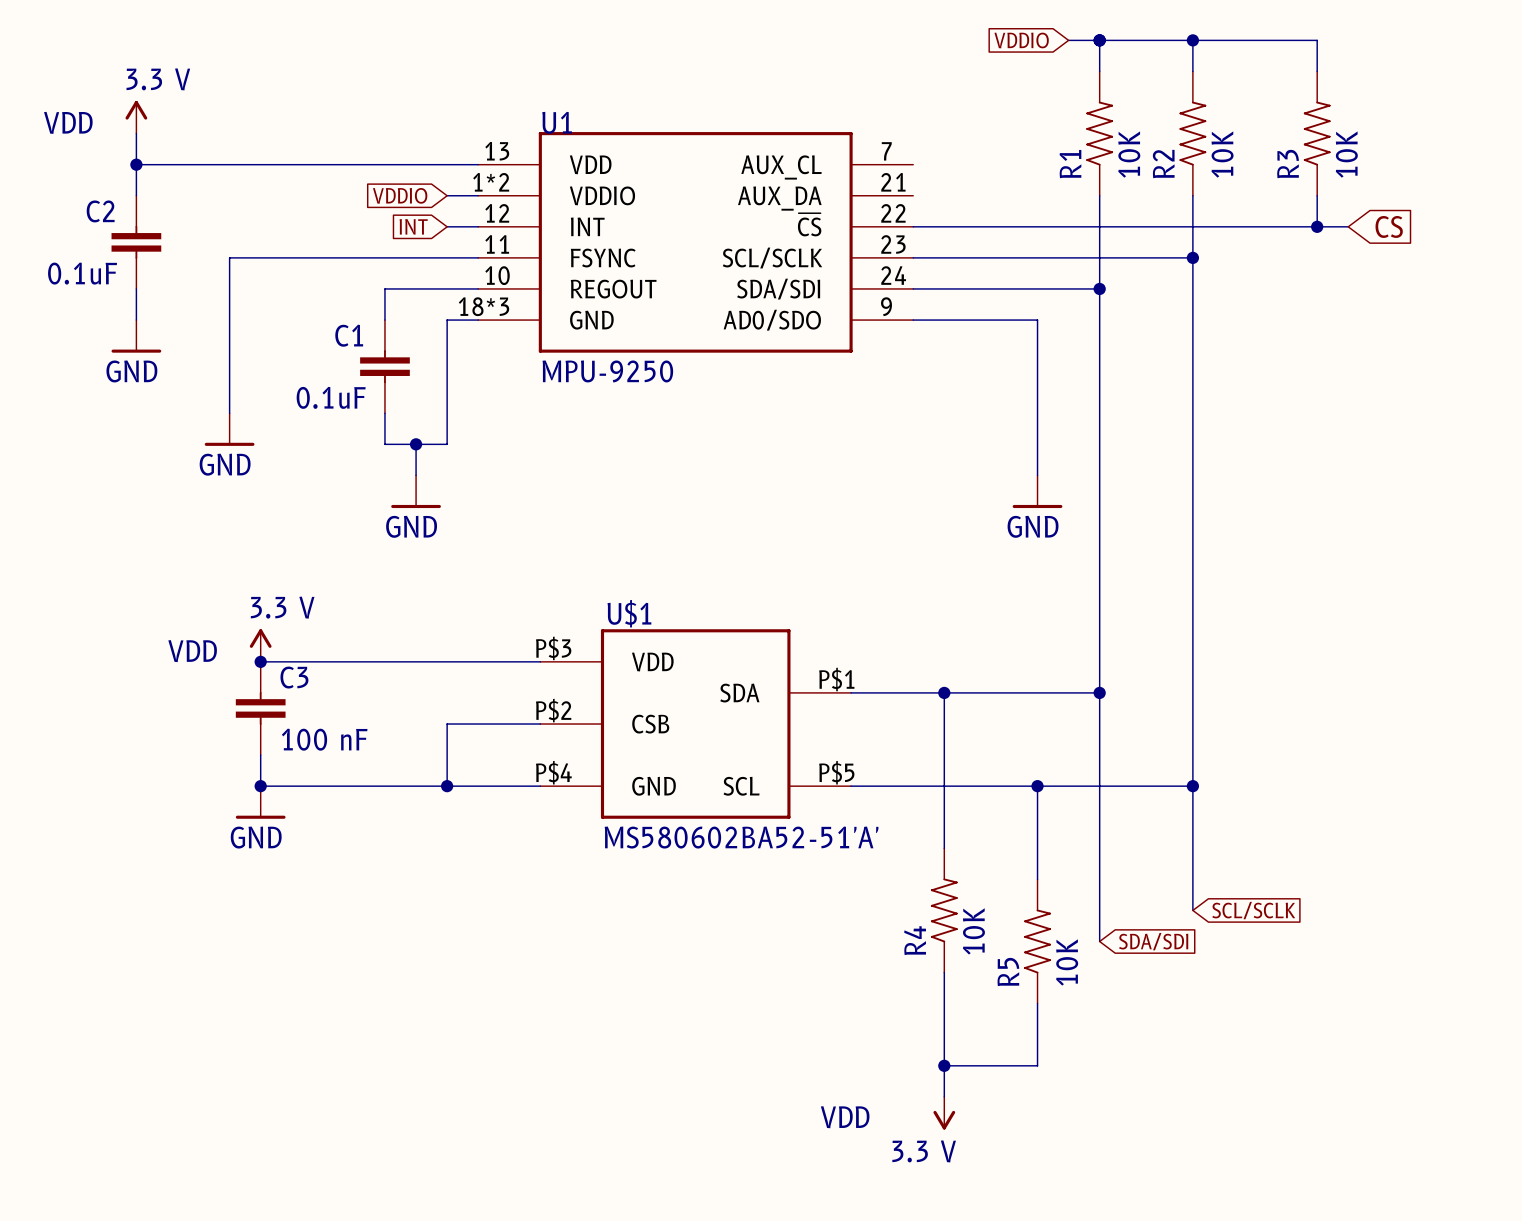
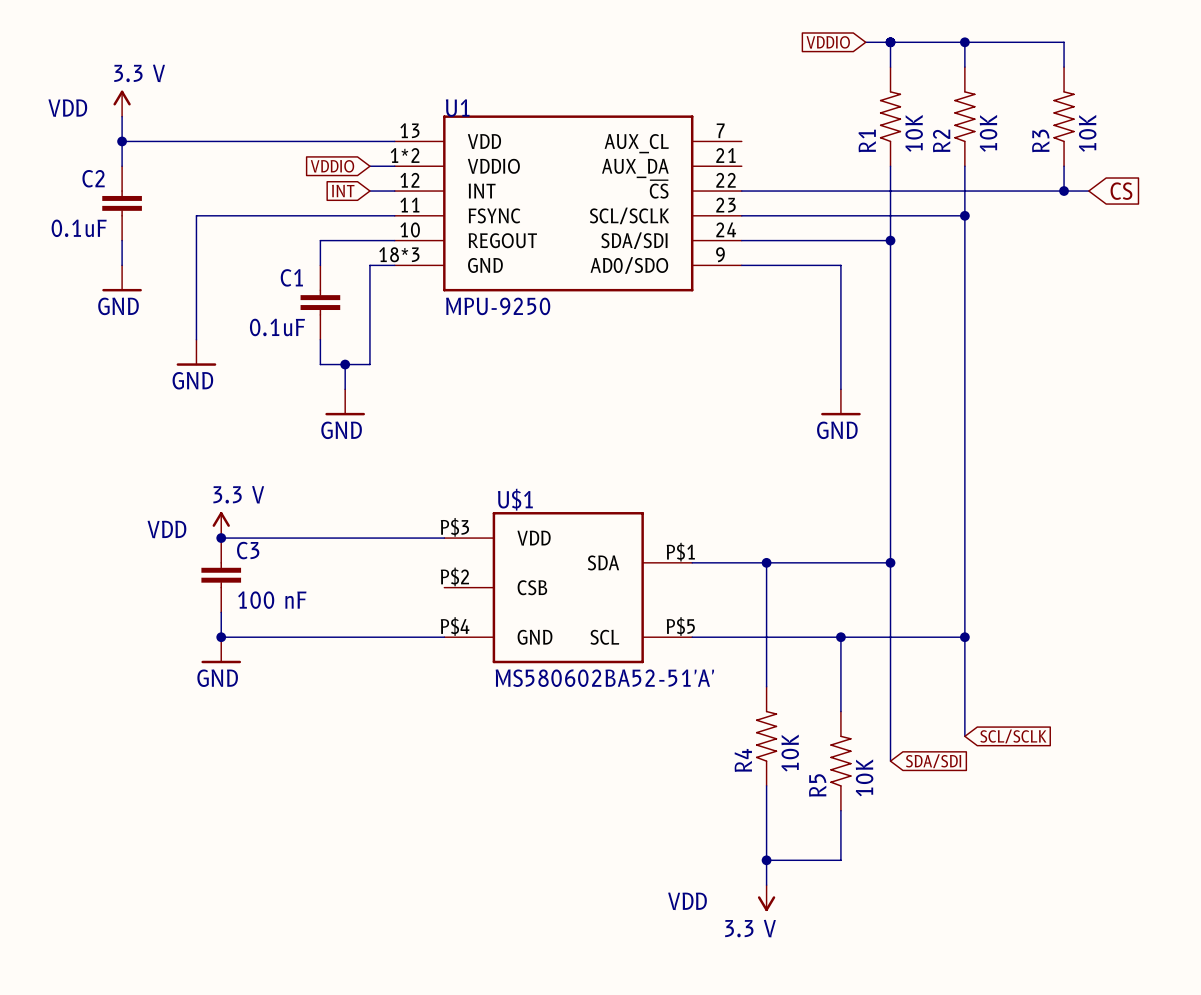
wire: (540, 724) (447, 724) (447, 786) -> none
junction: (447, 786) -> none

